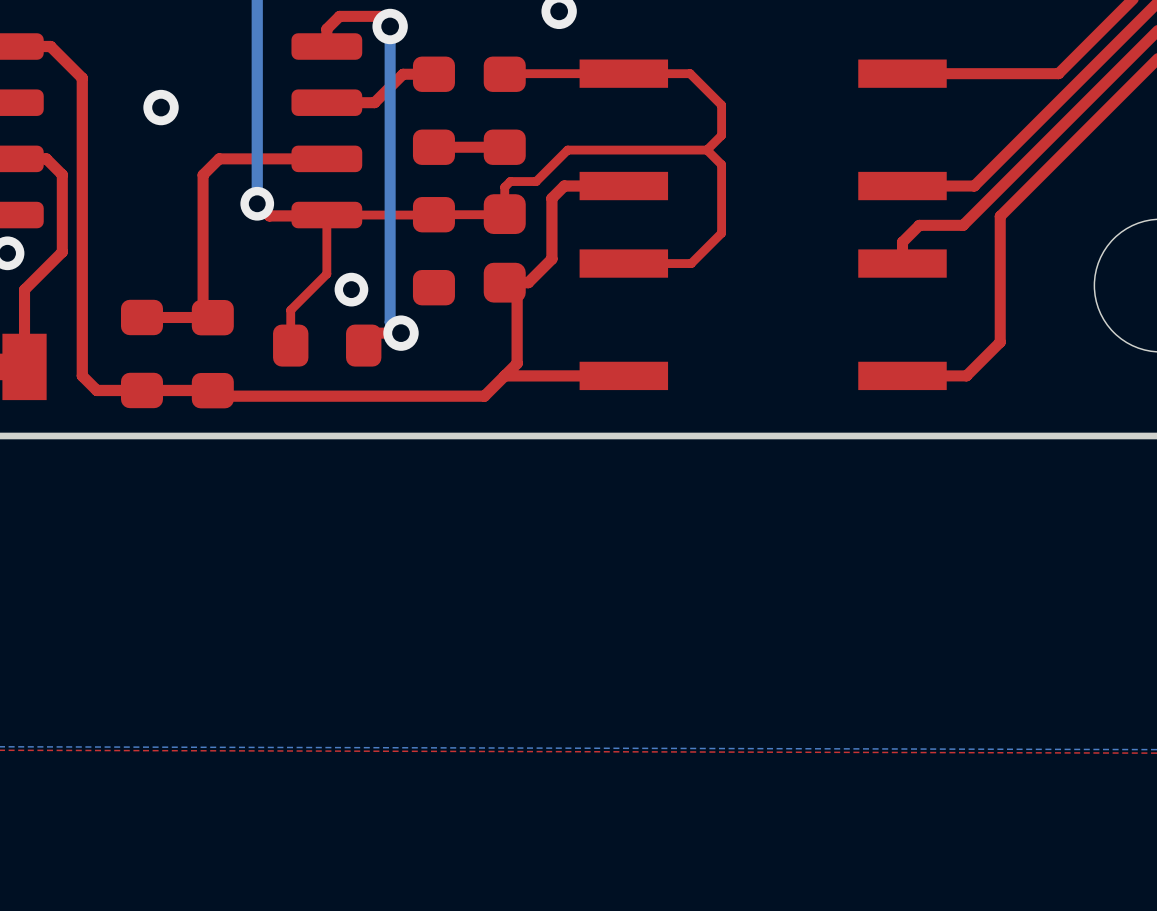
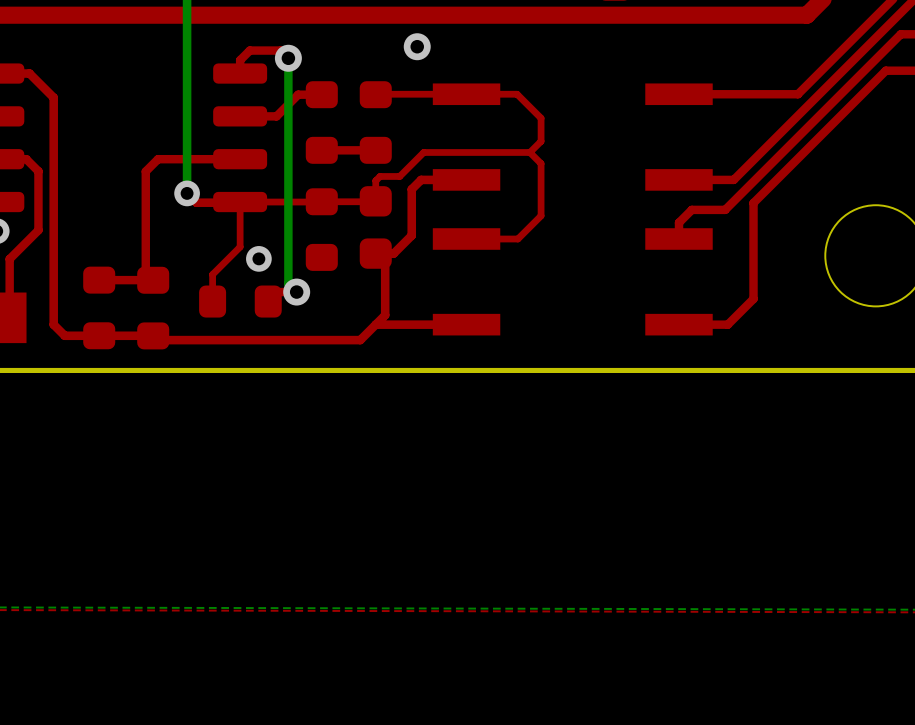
via: (161, 107) -> none

